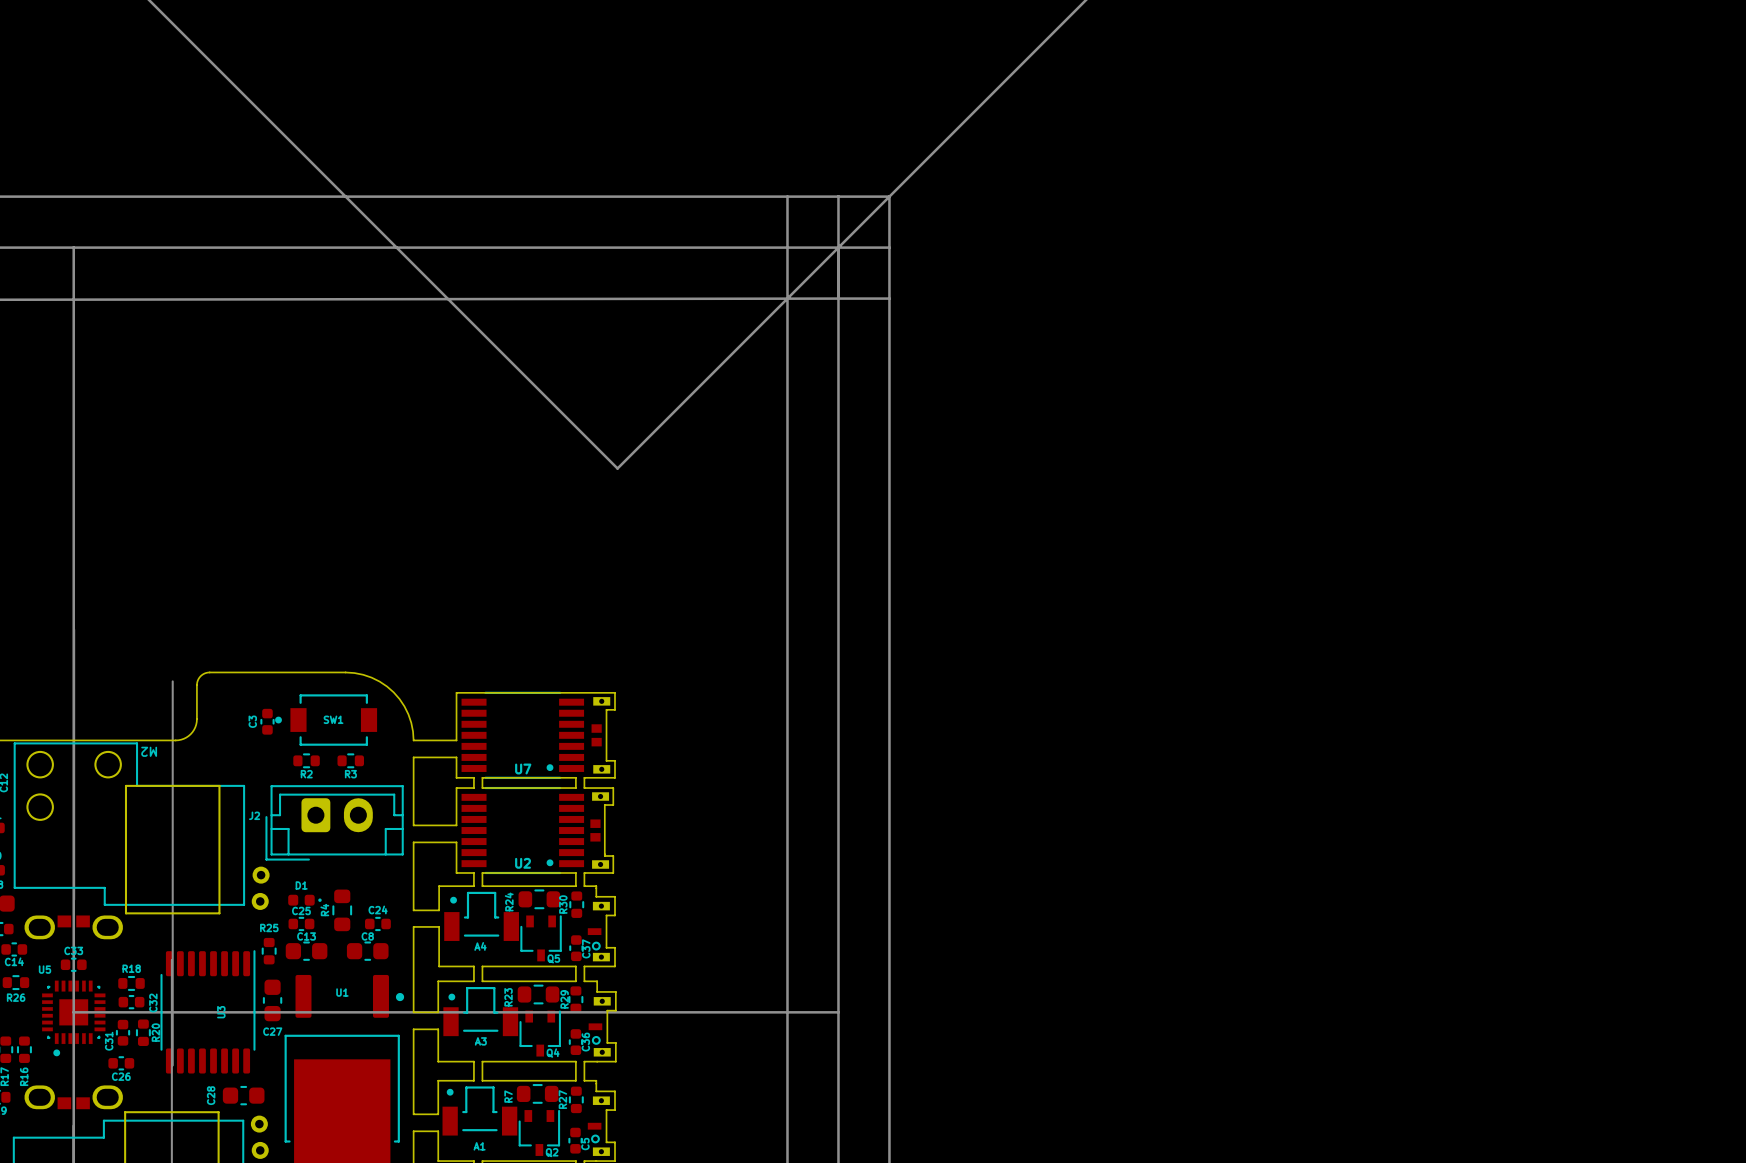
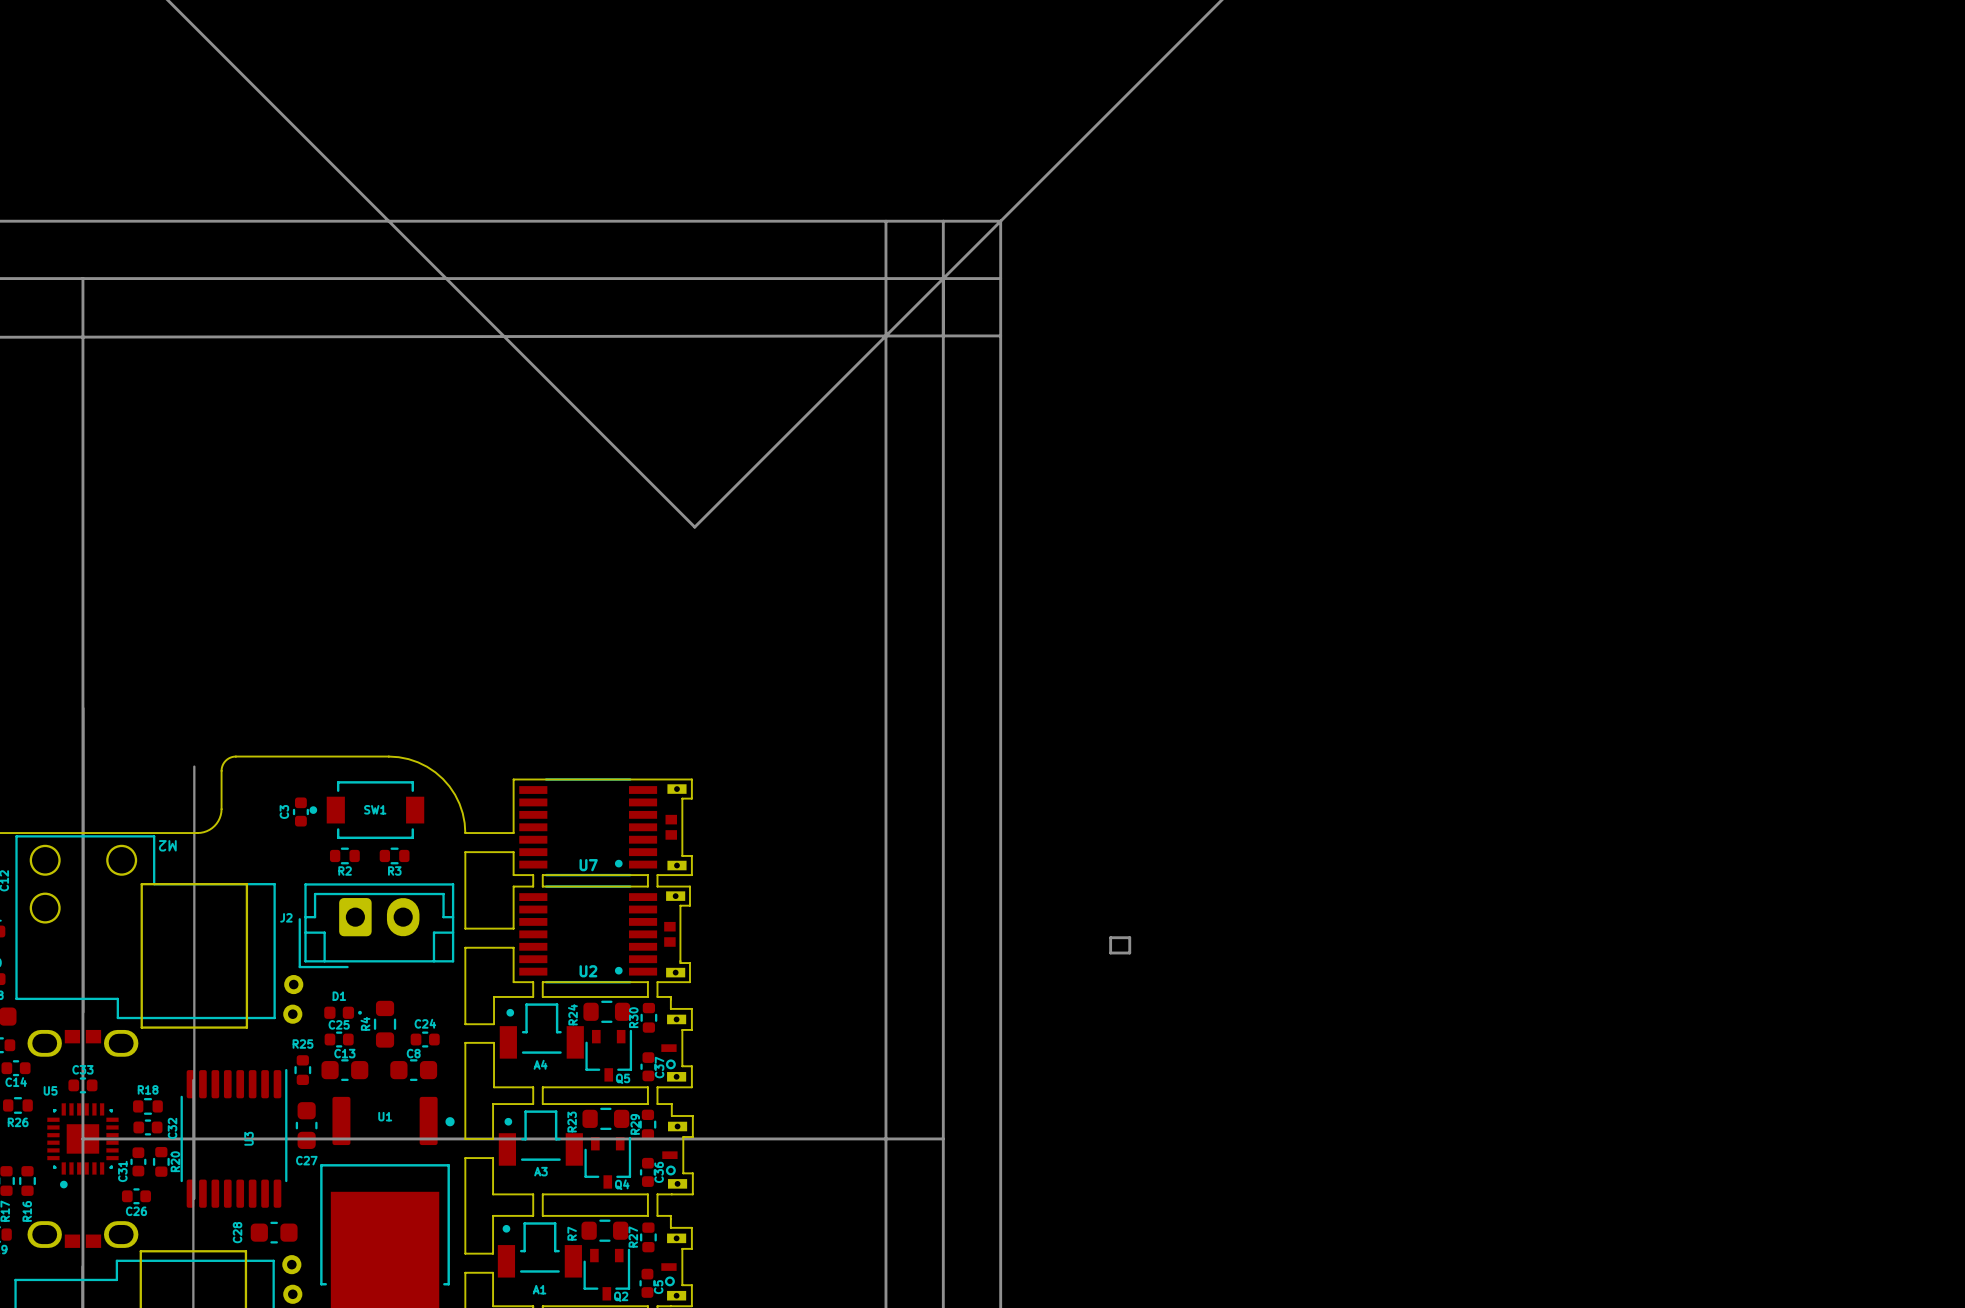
line: none -> (1110, 937) (1129, 937) (1129, 953) (1110, 953) (1110, 937)

